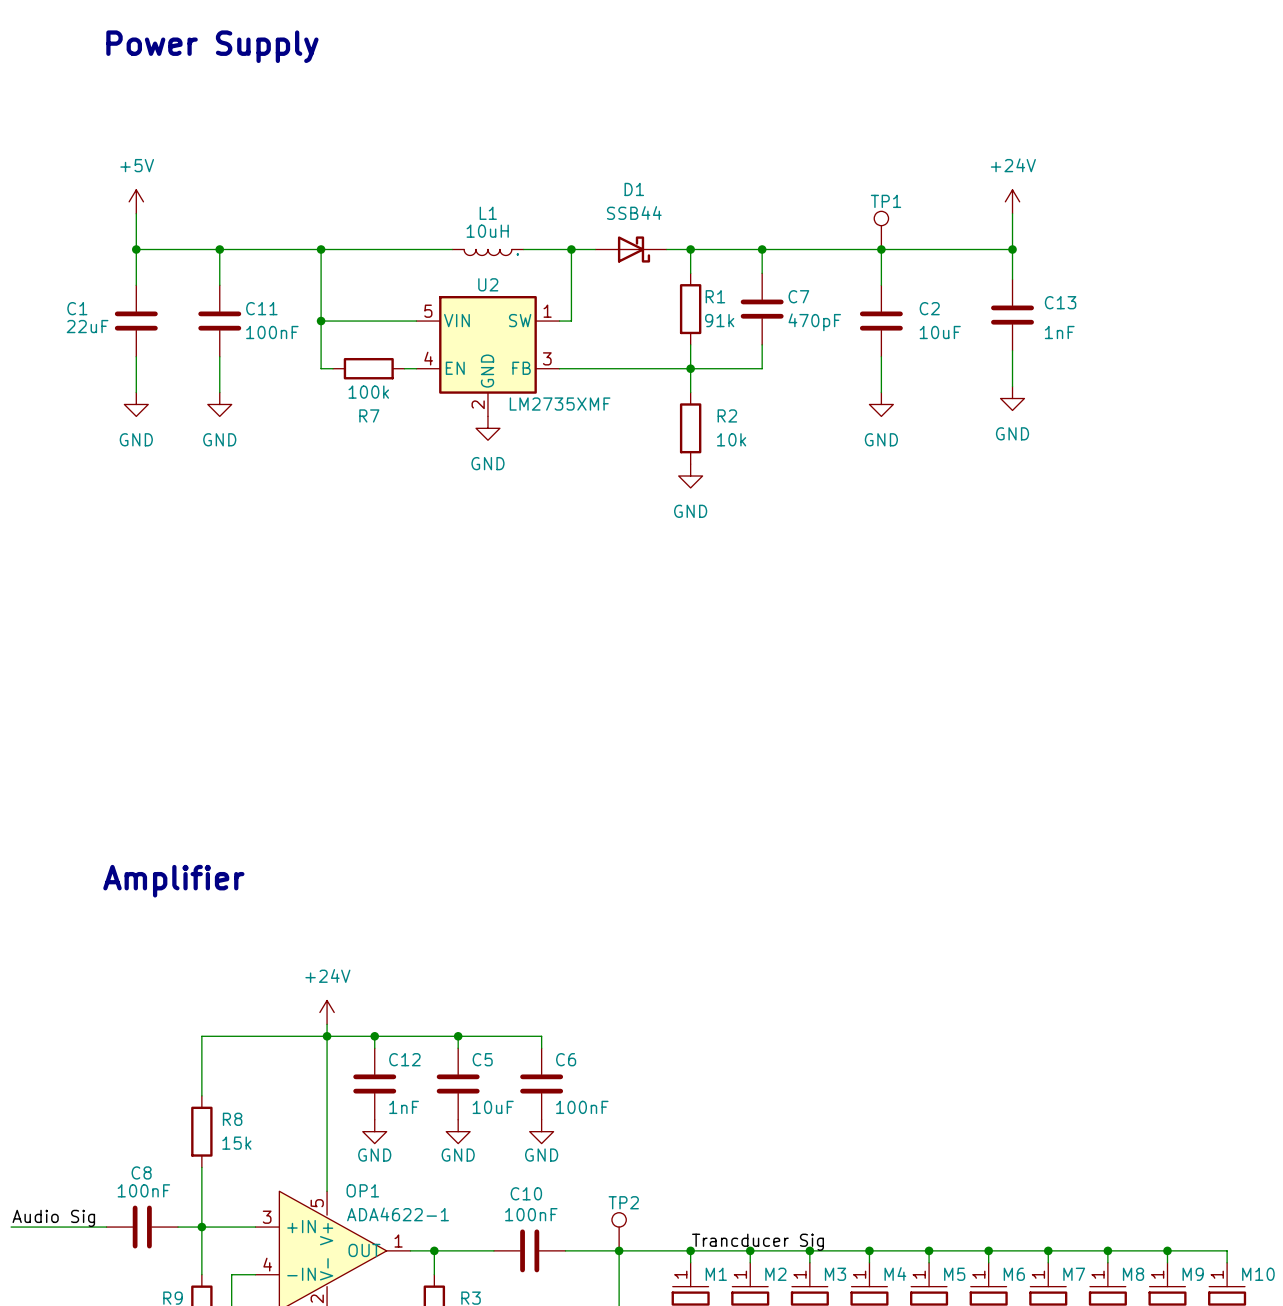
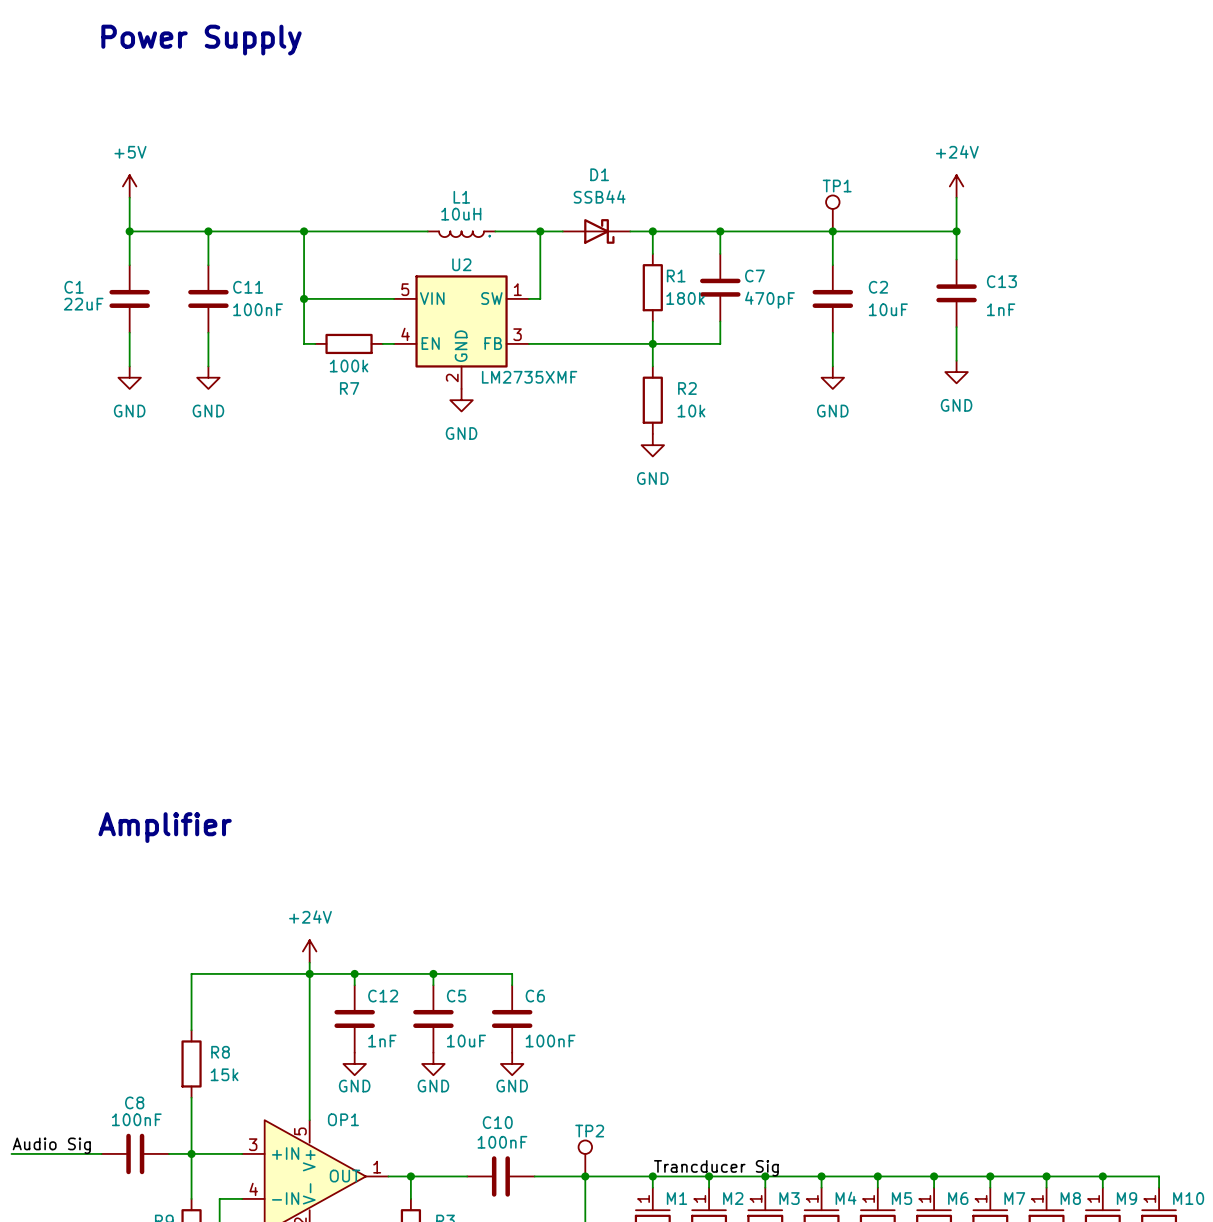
R1 value: 91k (719, 320) -> 180k (685, 298)
OP1 value: ADA4622-1 (398, 1214) -> none

